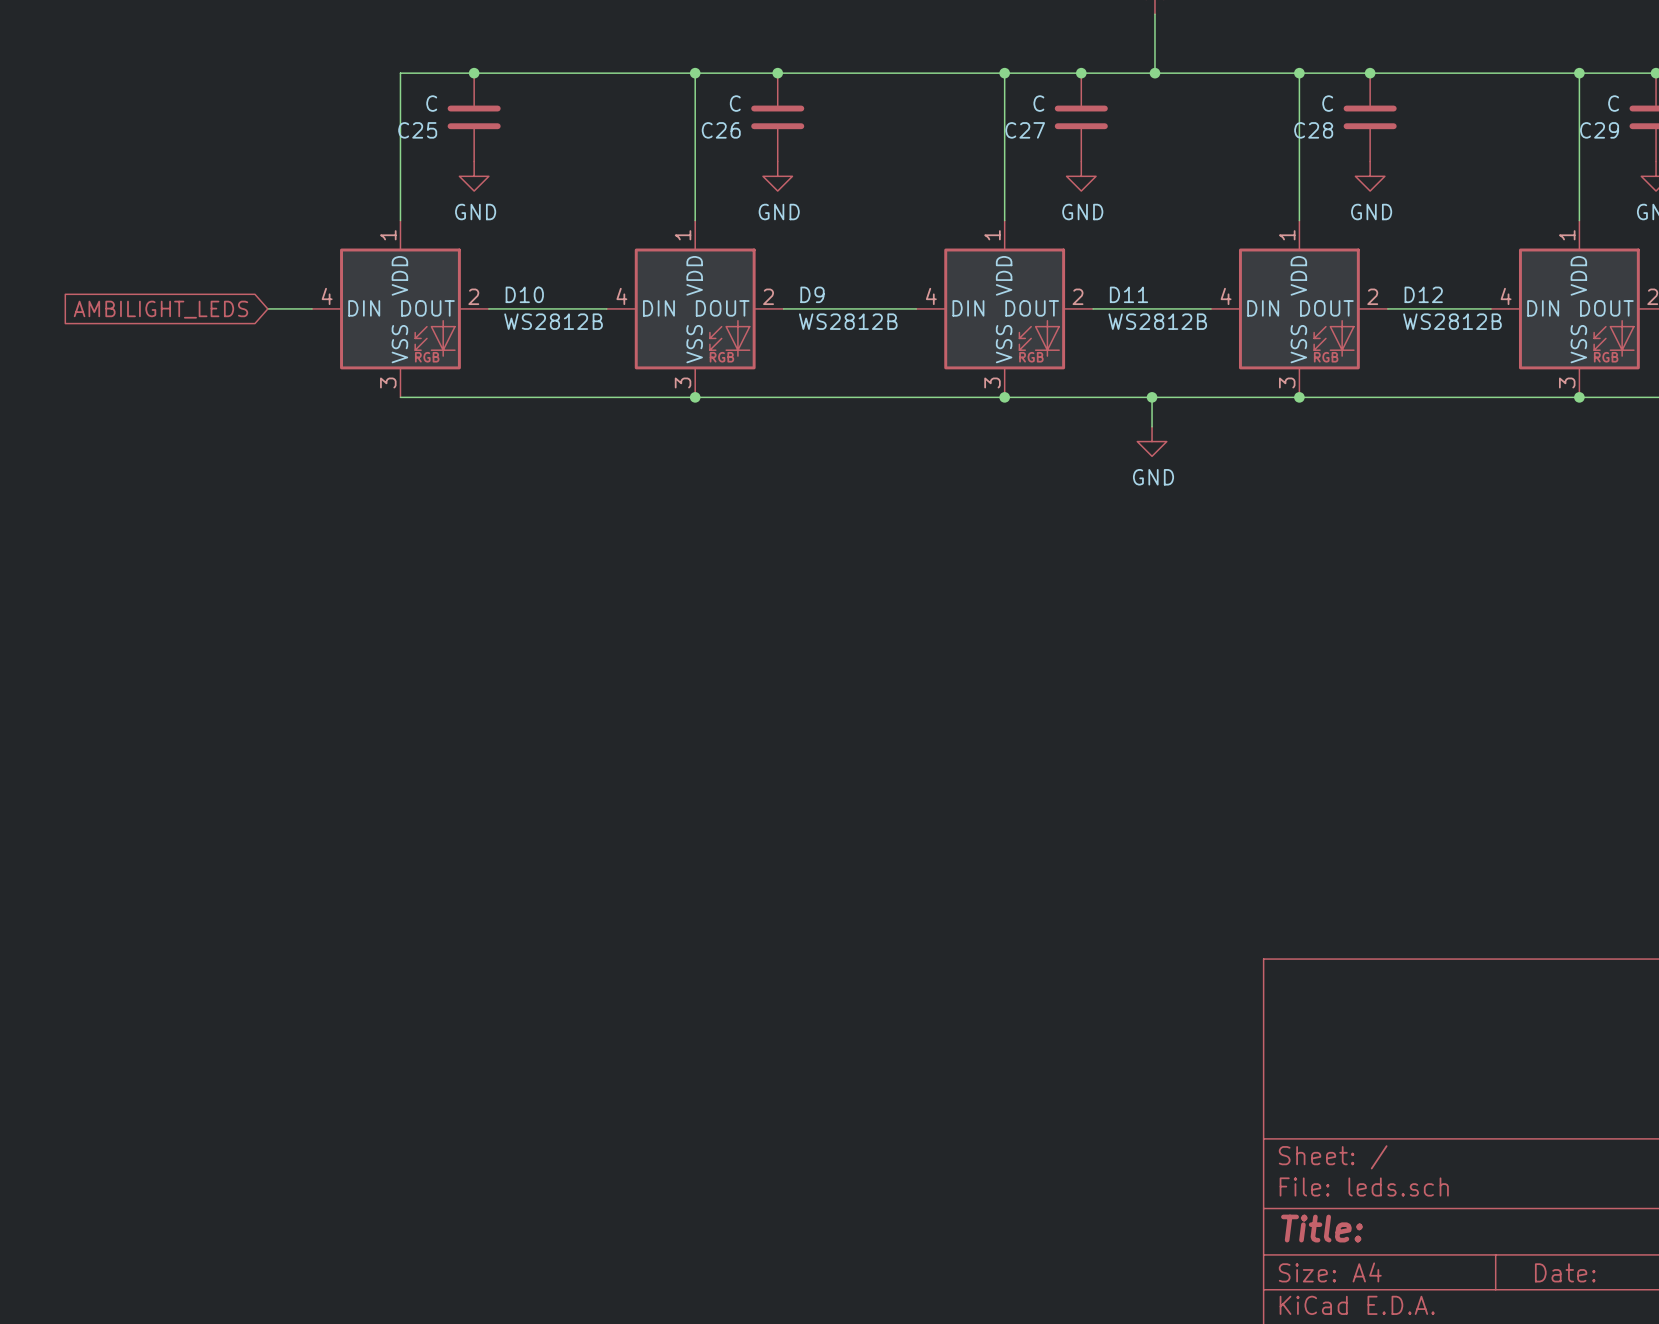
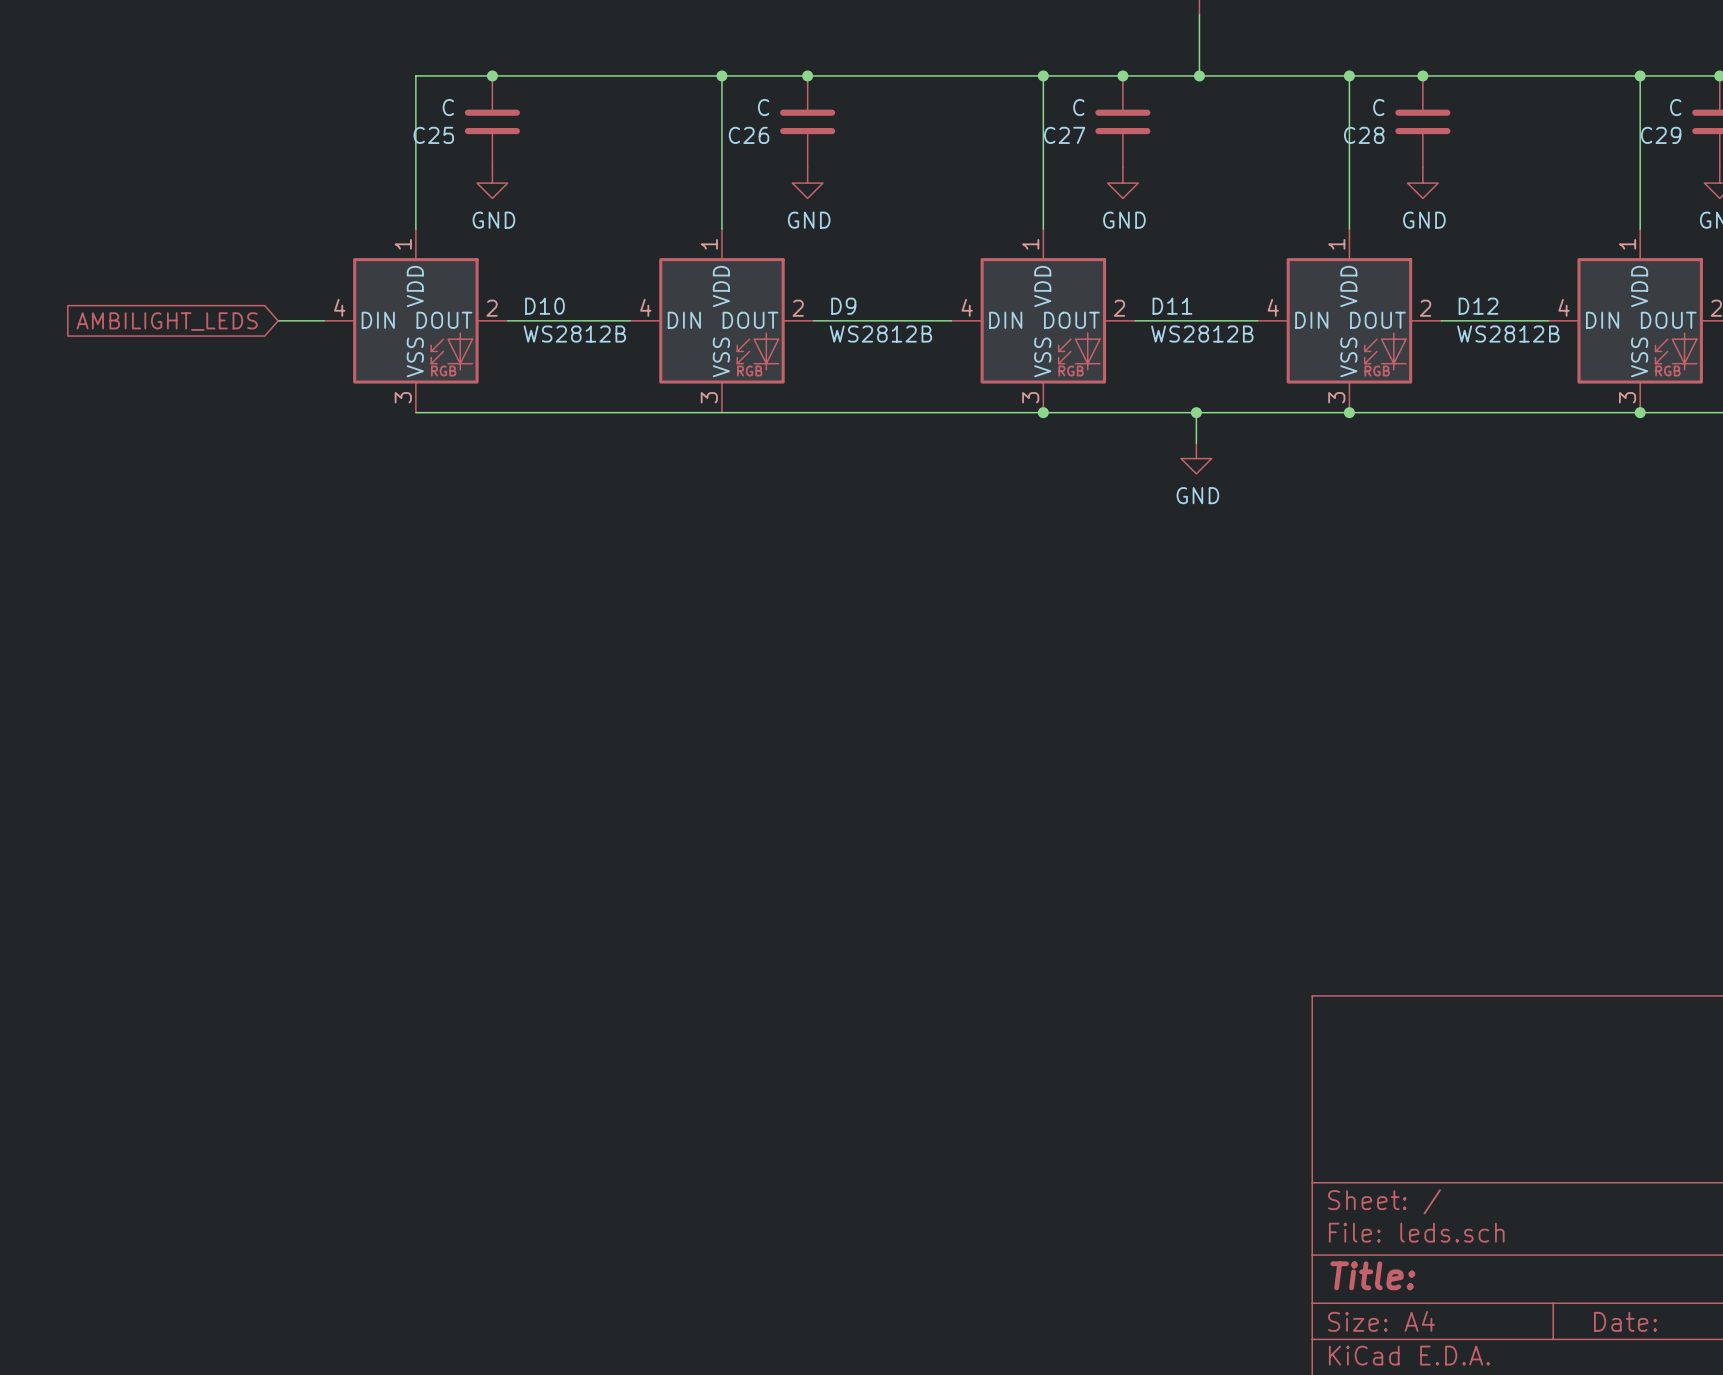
junction: (695, 397) -> none

